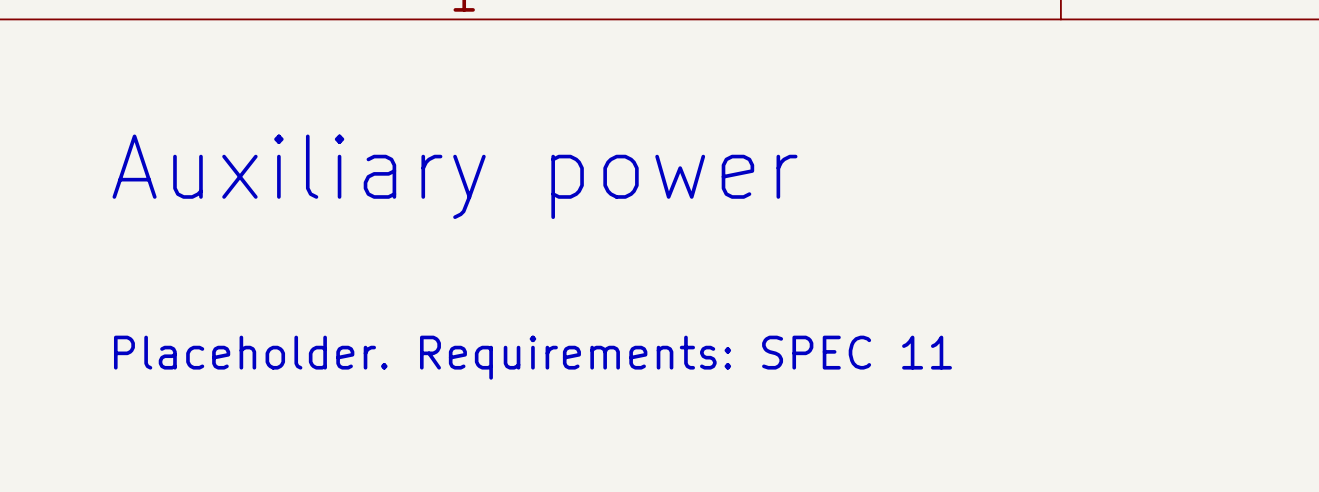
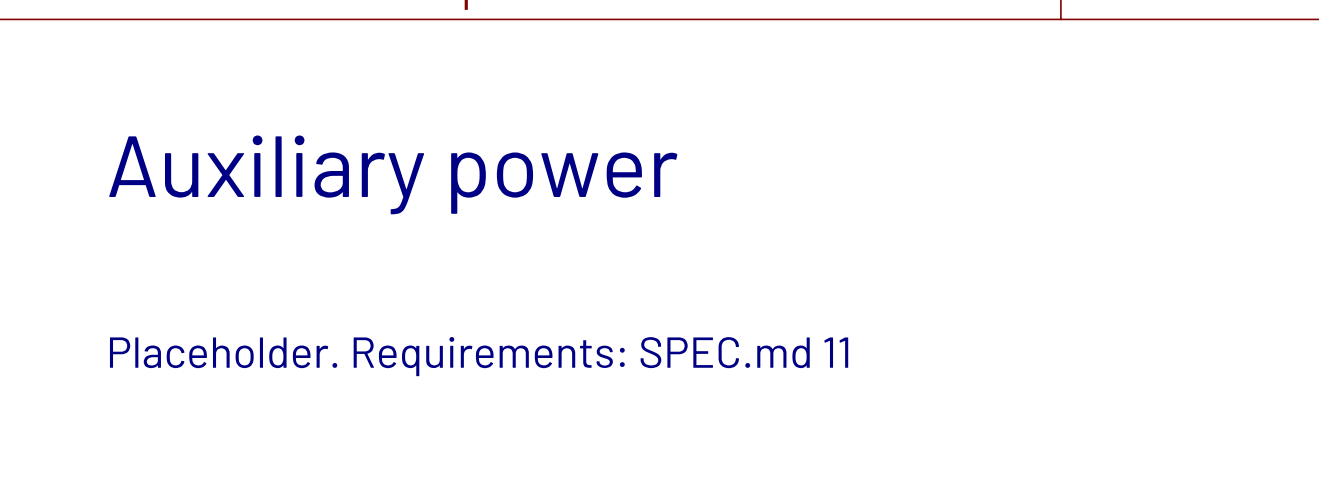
text: Placeholder. Requirements: SPEC 11 (532, 357) -> Placeholder. Requirements: SPEC.md 11 (479, 356)

